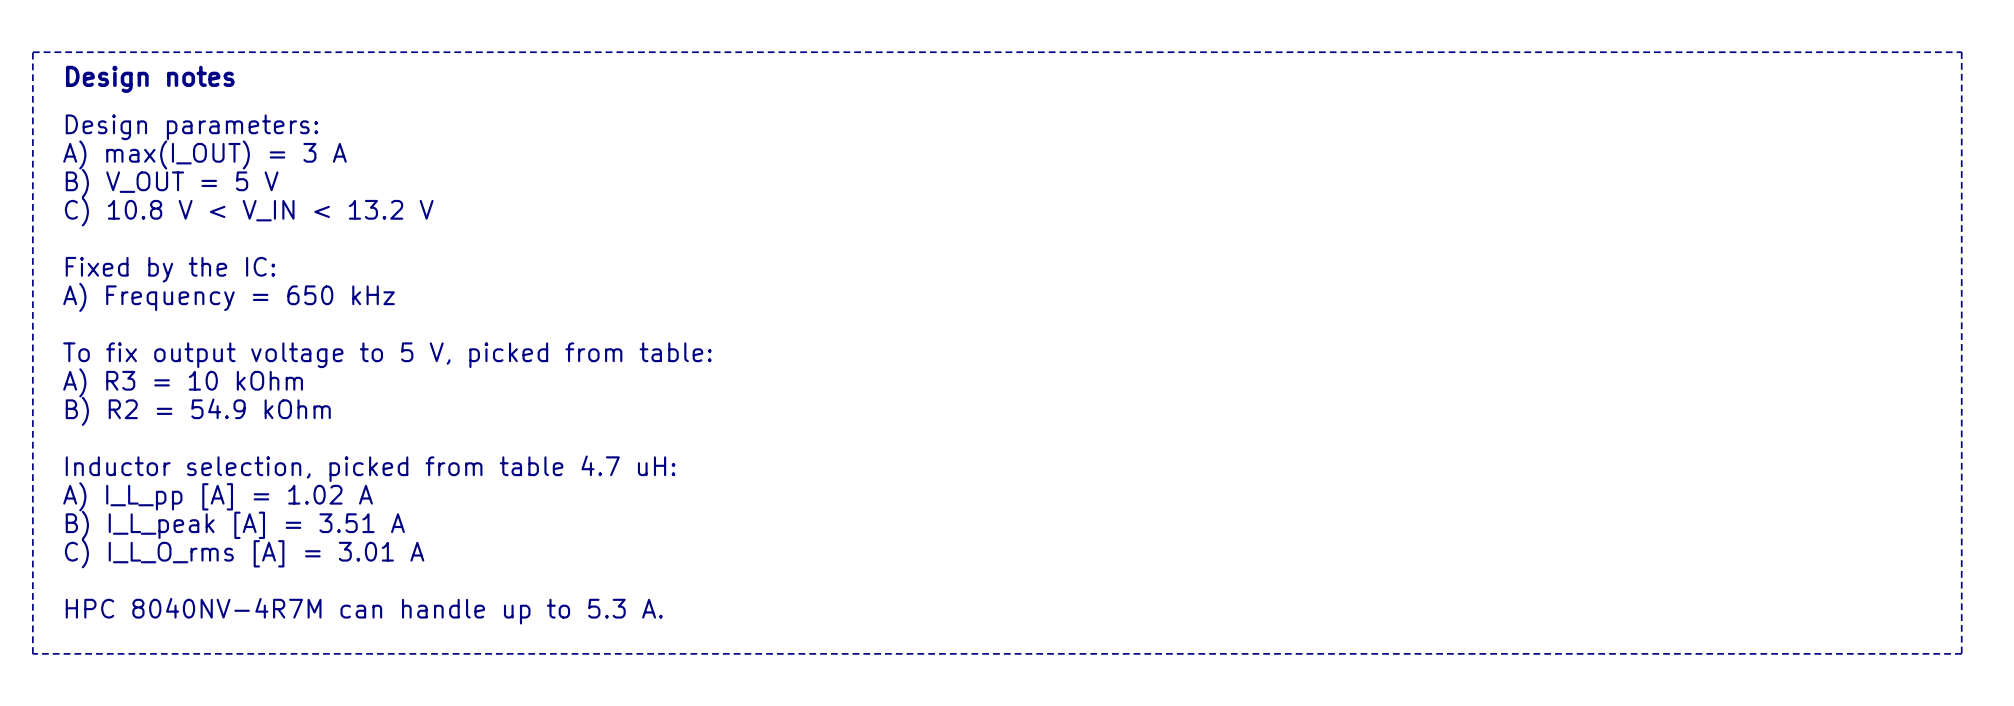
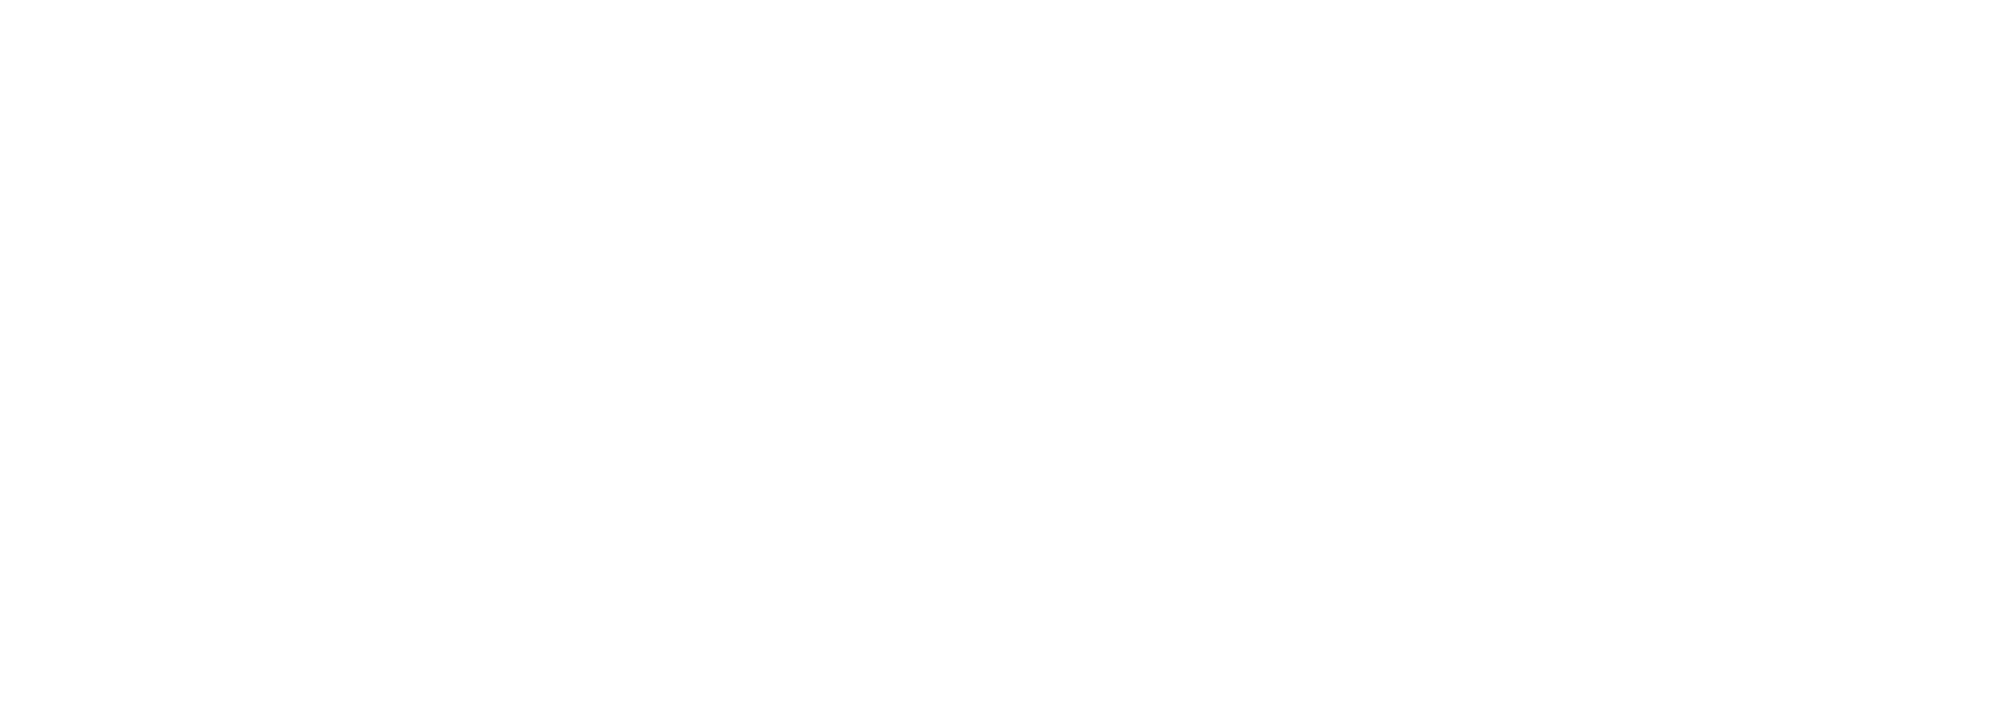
line: (32, 52) (1961, 52) (1961, 653) (32, 653) (32, 52) -> none
text: Design notes (150, 79) -> none
text: Design parameters: (191, 127) -> none
text: A) max(I_OUT) = 3 A (205, 154) -> none
text: B) V_OUT = 5 V (172, 183) -> none
text: C) 10.8 V < V_IN < 13.2 V (249, 211) -> none
text: Fixed by the IC: (170, 269) -> none
text: A) Frequency = 650 kHz (229, 297) -> none
text: To fix output voltage to 5 V, picked from table: (387, 355) -> none
text: A) R3 = 10 kOhm (183, 382) -> none
text: B) R2 = 54.9 kOhm (198, 411) -> none
text: Inductor selection, picked from table 4.7 uH: (370, 468) -> none
text: A) I_L_pp [A] = 1.02 A (218, 496) -> none
text: B) I_L_peak [A] = 3.51 A (235, 525) -> none
text: C) I_L_O_rms [A] = 3.01 A (244, 553) -> none
text: HPC 8040NV-4R7M can handle up to 5.3 A. (364, 611) -> none

